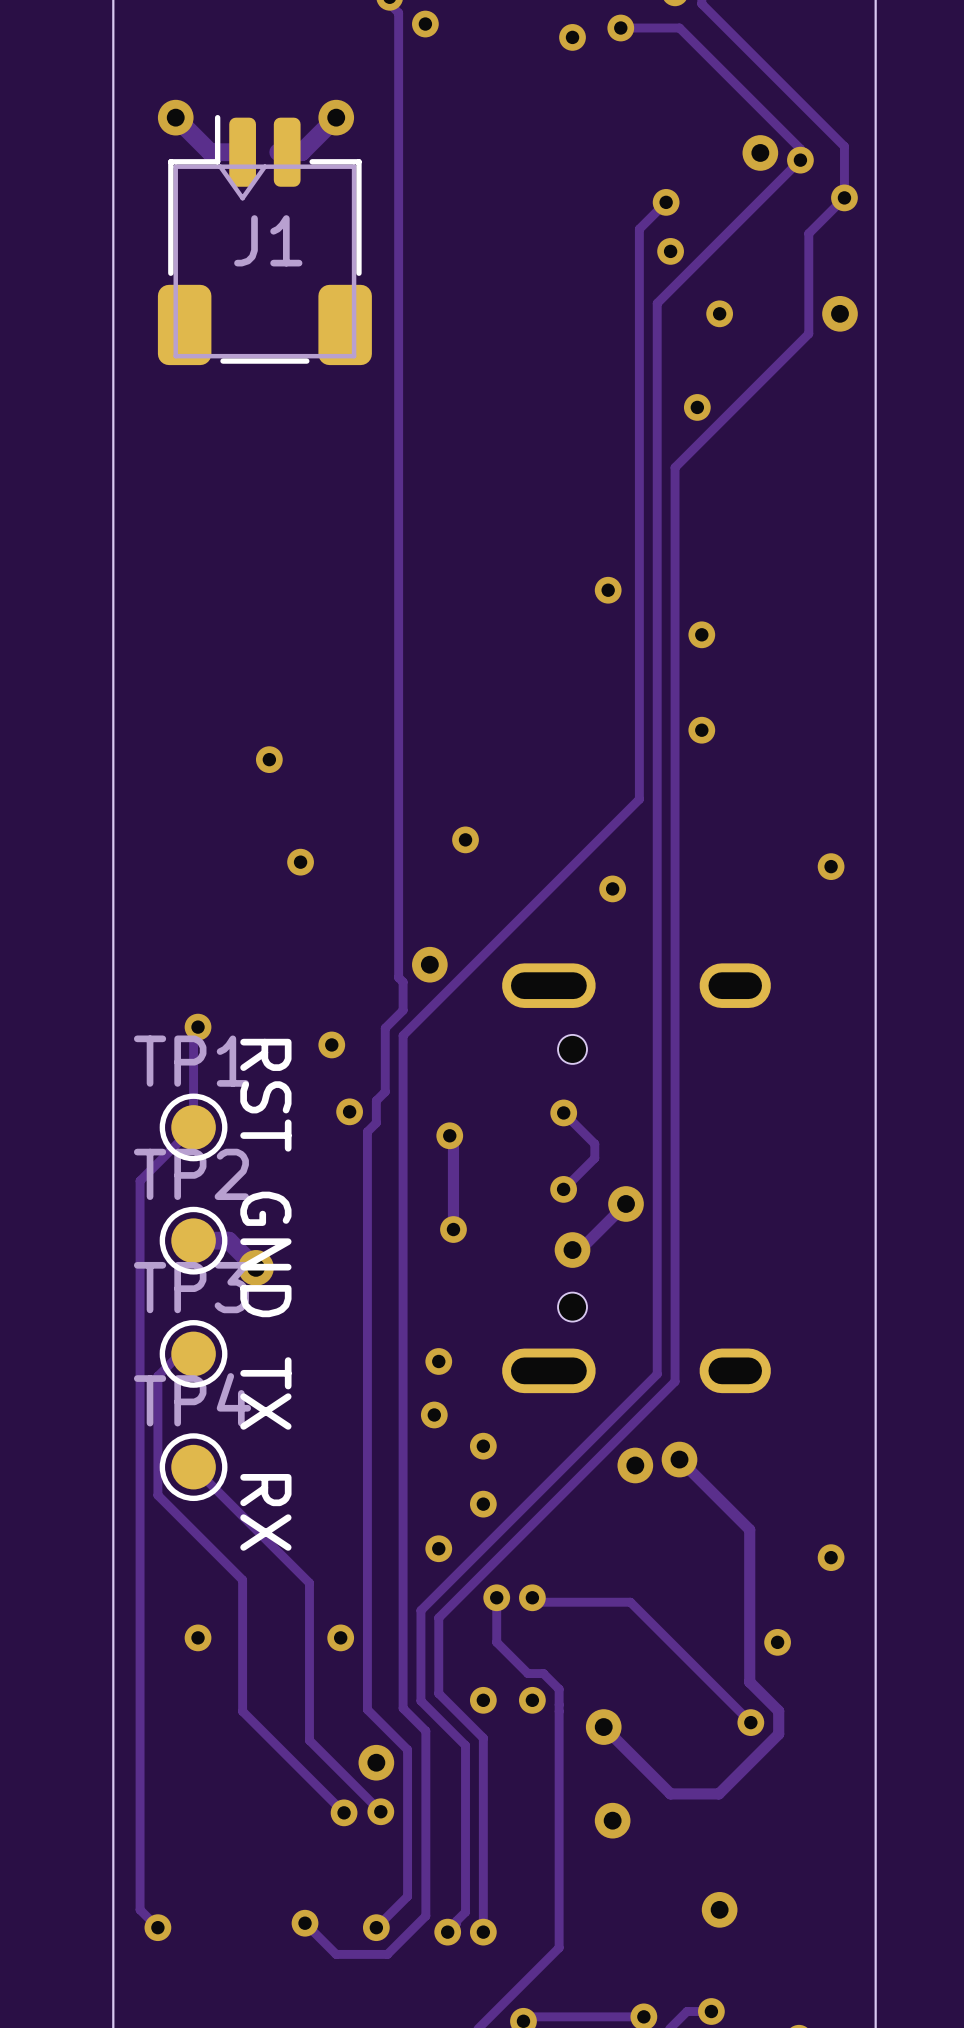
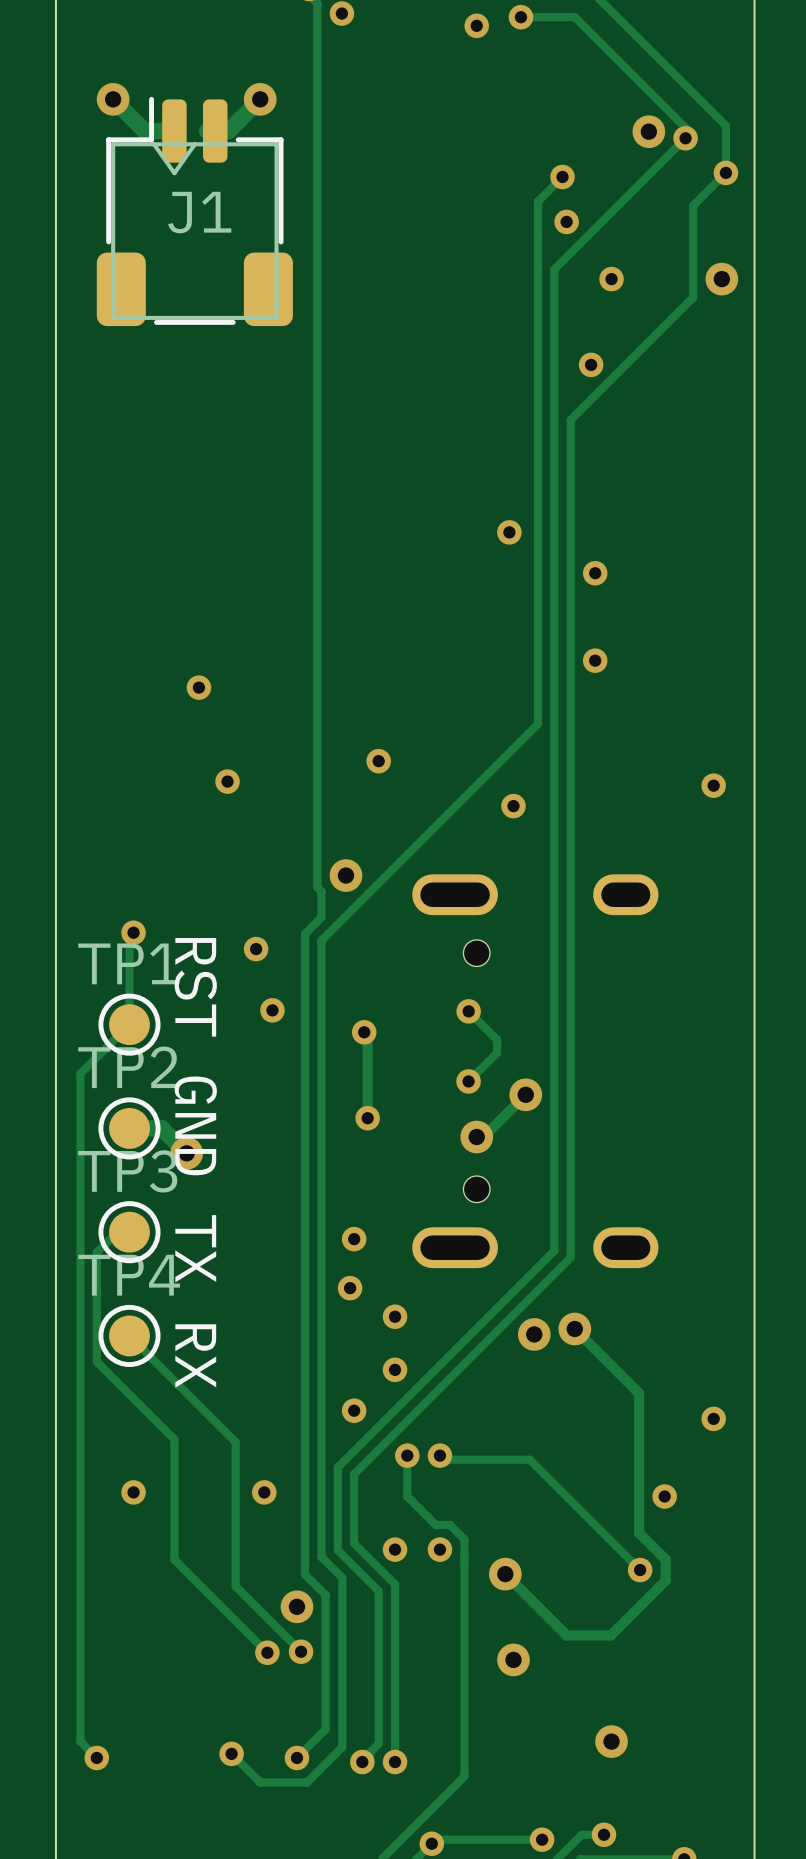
track: (385, 1091) (376, 1100) (376, 1122) (367, 1131) (367, 1709) (385, 1727) -> (305, 992) (305, 1574)

